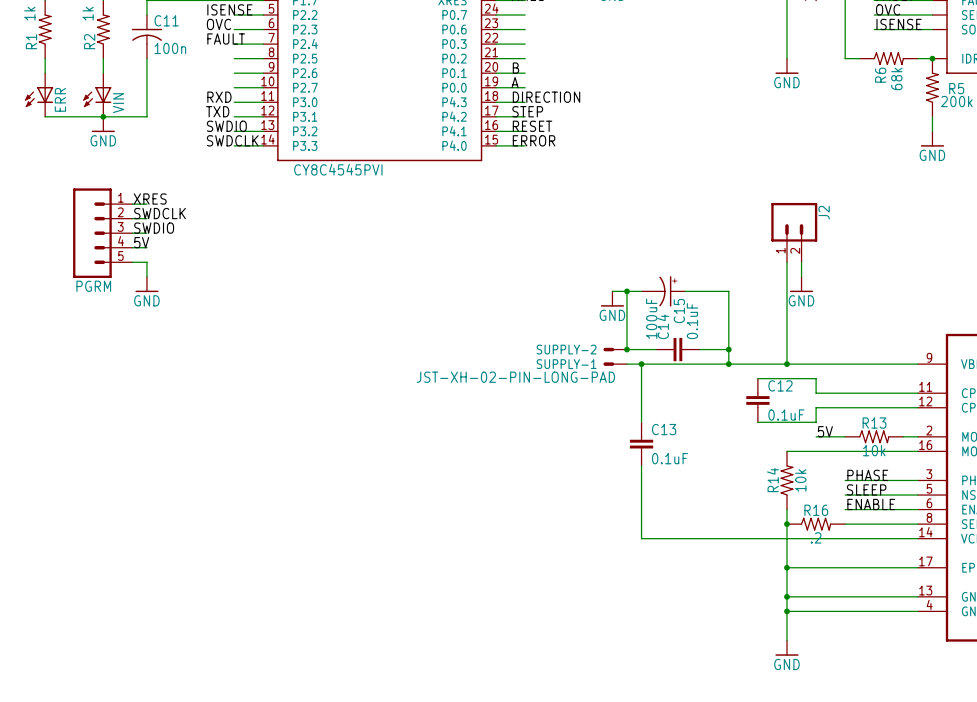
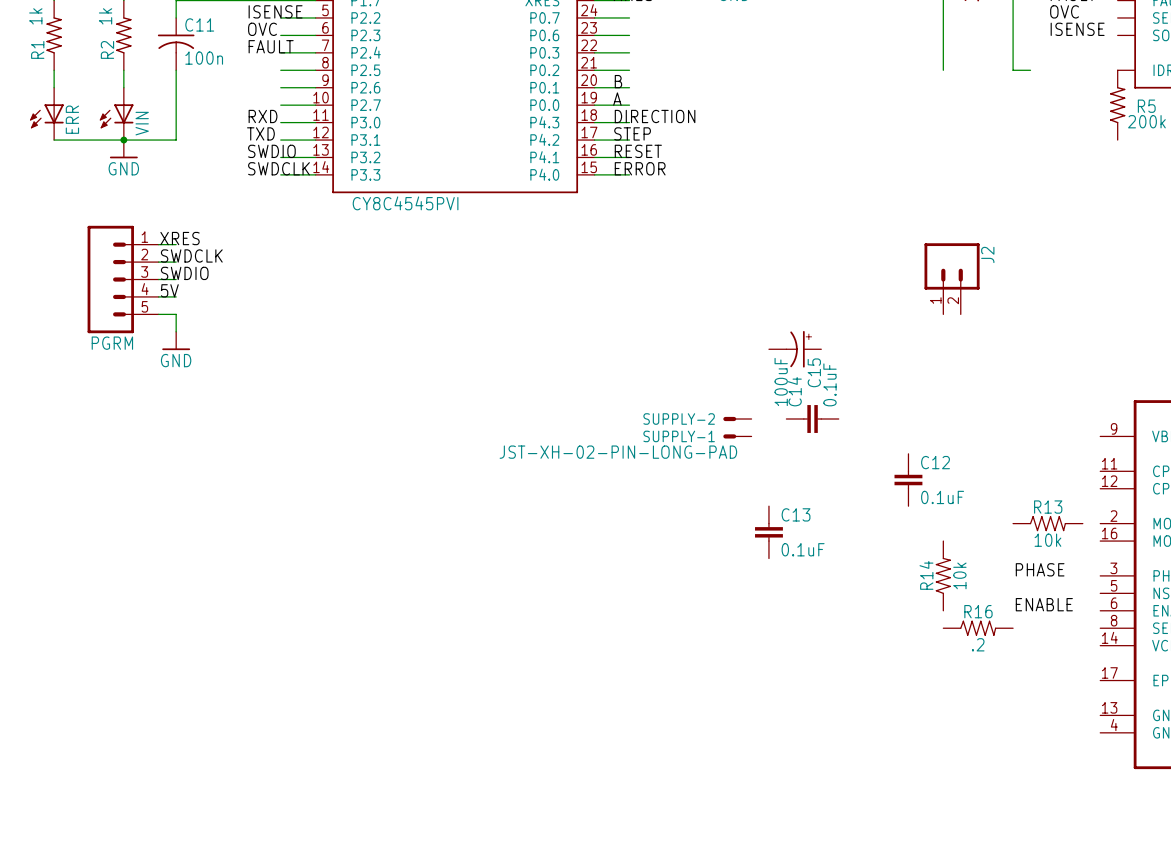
wire: (874, 0) (932, 0) -> none
wire: (874, 15) (932, 15) -> none
wire: (874, 29) (932, 29) -> none
R6: 68k (888, 58) -> none
wire: (917, 58) (932, 58) -> none
junction: (932, 58) -> none
power symbol: GND (787, 66) -> none
wire: (932, 116) (932, 131) -> none
power symbol: GND (932, 139) -> none
wire: (787, 262) (787, 364) -> none
wire: (801, 262) (801, 276) -> none
power symbol: GND (801, 284) -> none
wire: (612, 291) (641, 291) -> none
wire: (626, 291) (626, 349) (656, 349) -> none
junction: (626, 291) -> none
wire: (685, 291) (728, 291) (728, 364) -> none
power symbol: GND (612, 299) -> none
junction: (626, 349) -> none
wire: (699, 349) (728, 349) -> none
junction: (728, 349) -> none
wire: (626, 364) (917, 364) -> none
wire: (641, 364) (641, 422) -> none
junction: (641, 364) -> none
junction: (728, 364) -> none
junction: (787, 364) -> none
wire: (757, 378) (816, 378) (816, 393) (917, 393) -> none
wire: (917, 407) (816, 407) (816, 422) (757, 422) -> none
label: 5V (825, 431) -> none
wire: (816, 436) (845, 436) -> none
wire: (903, 436) (917, 436) -> none
wire: (787, 451) (917, 451) -> none
wire: (641, 465) (641, 538) (917, 538) -> none
wire: (845, 480) (917, 480) -> none
label: SLEEP (866, 489) -> none
wire: (845, 495) (917, 495) -> none
wire: (787, 509) (787, 640) -> none
wire: (845, 509) (917, 509) -> none
junction: (787, 524) -> none
wire: (845, 524) (917, 524) -> none
wire: (787, 567) (917, 567) -> none
junction: (787, 567) -> none
wire: (787, 596) (917, 596) -> none
junction: (787, 596) -> none
wire: (787, 611) (917, 611) -> none
junction: (787, 611) -> none
power symbol: GND (787, 648) -> none

